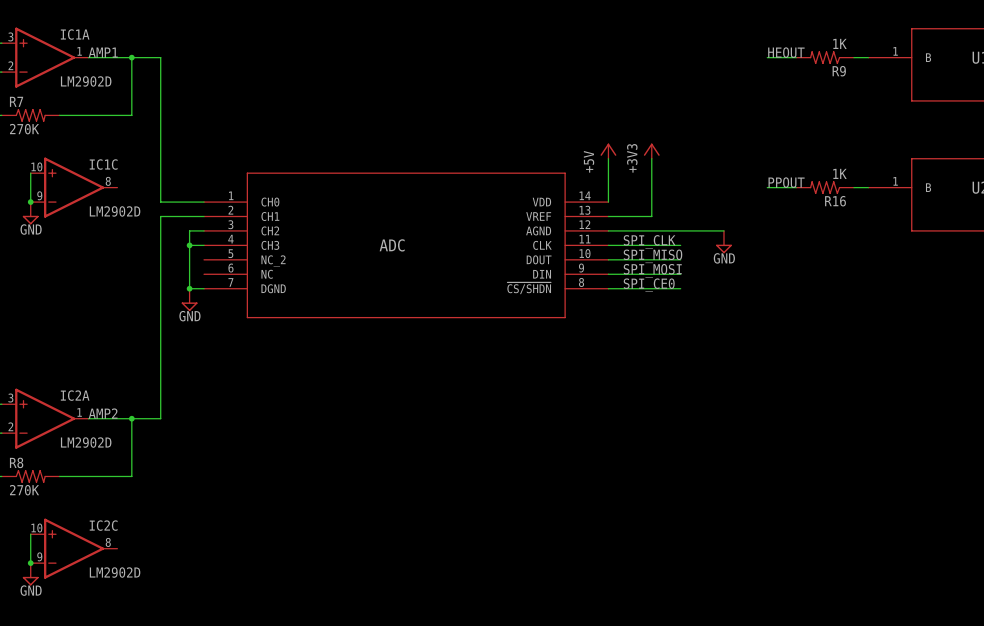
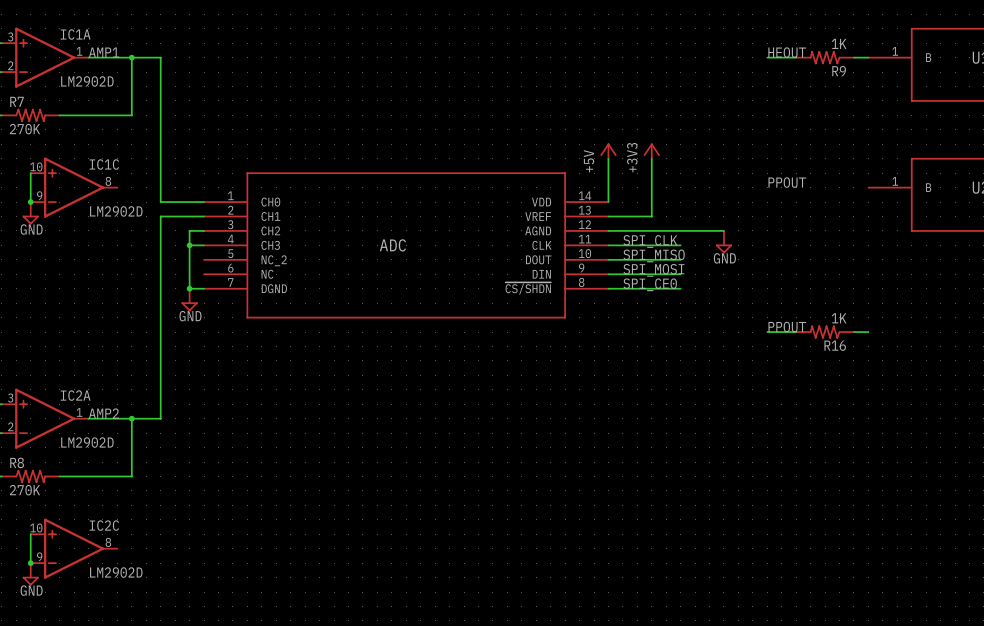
wire: (767, 187) (796, 187) -> none
R16 position: (825, 187) -> (825, 332)
wire: (853, 187) (868, 187) -> none
label: none -> PPOUT (787, 326)
wire: none -> (767, 332) (796, 332)
wire: none -> (853, 332) (868, 332)

